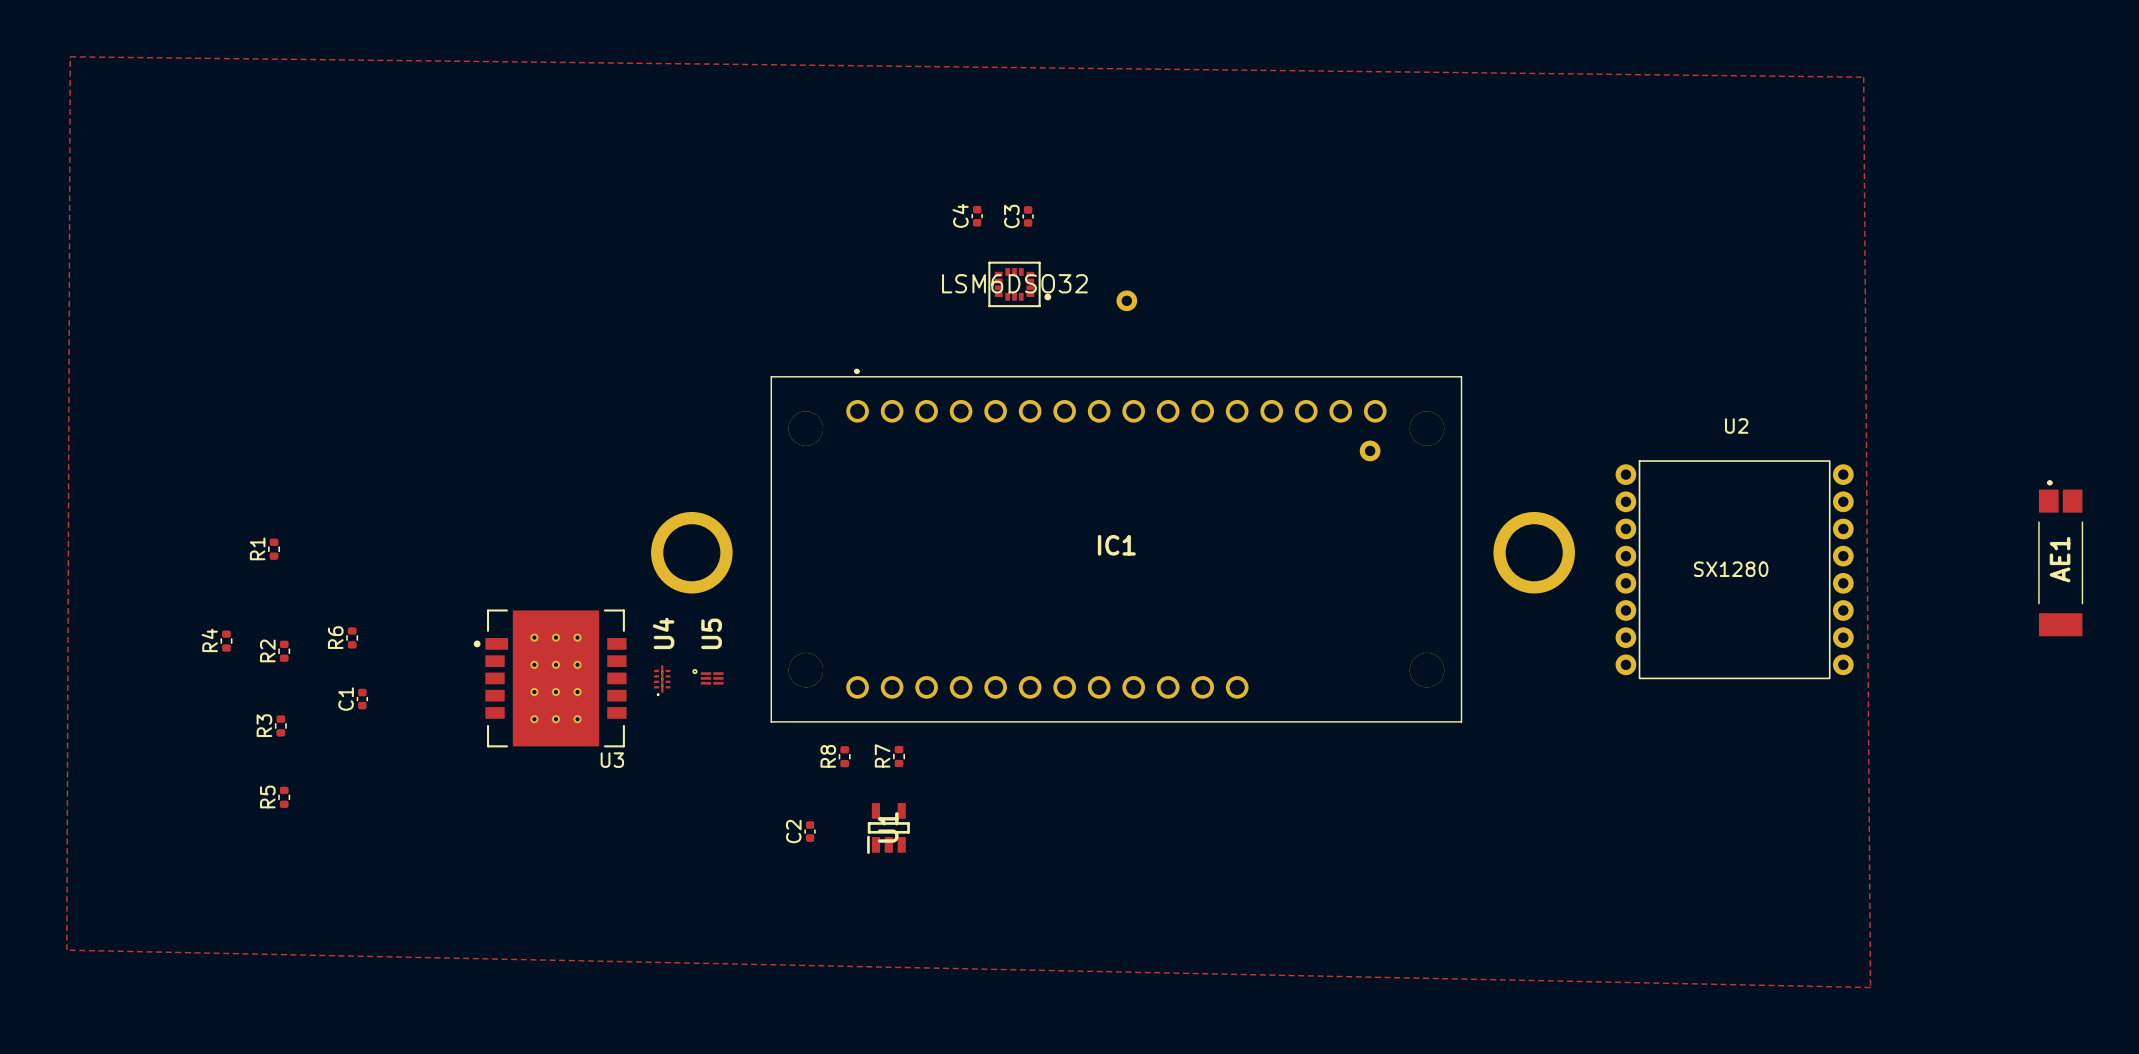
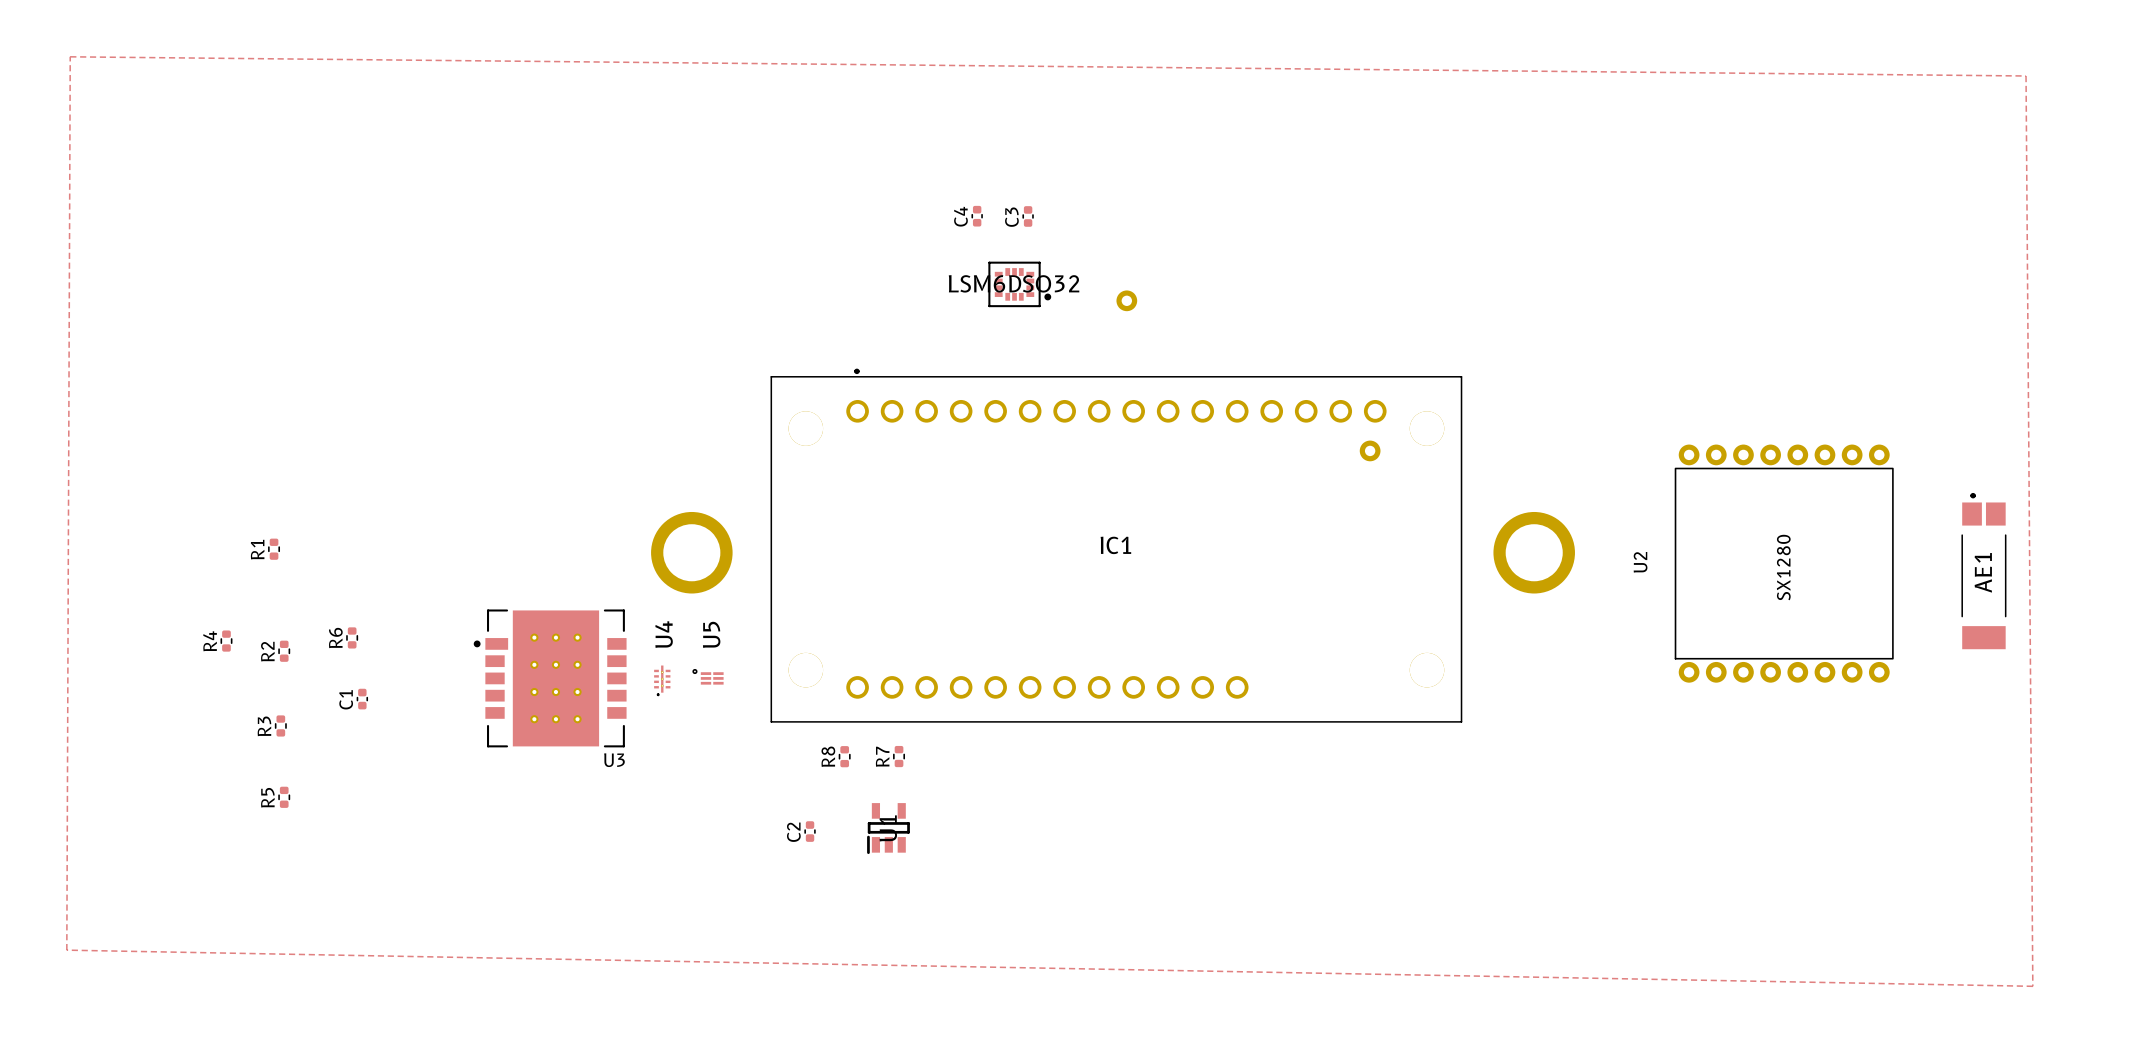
top zone outline: (70, 56) (1863, 77) (1870, 987) (66, 950) -> (70, 56) (2026, 75) (2032, 986) (66, 950)
AE1 position: (2060, 558) -> (1983, 571)
U2 rotation: 0° (1734, 569) -> 90° counterclockwise (1784, 563)

